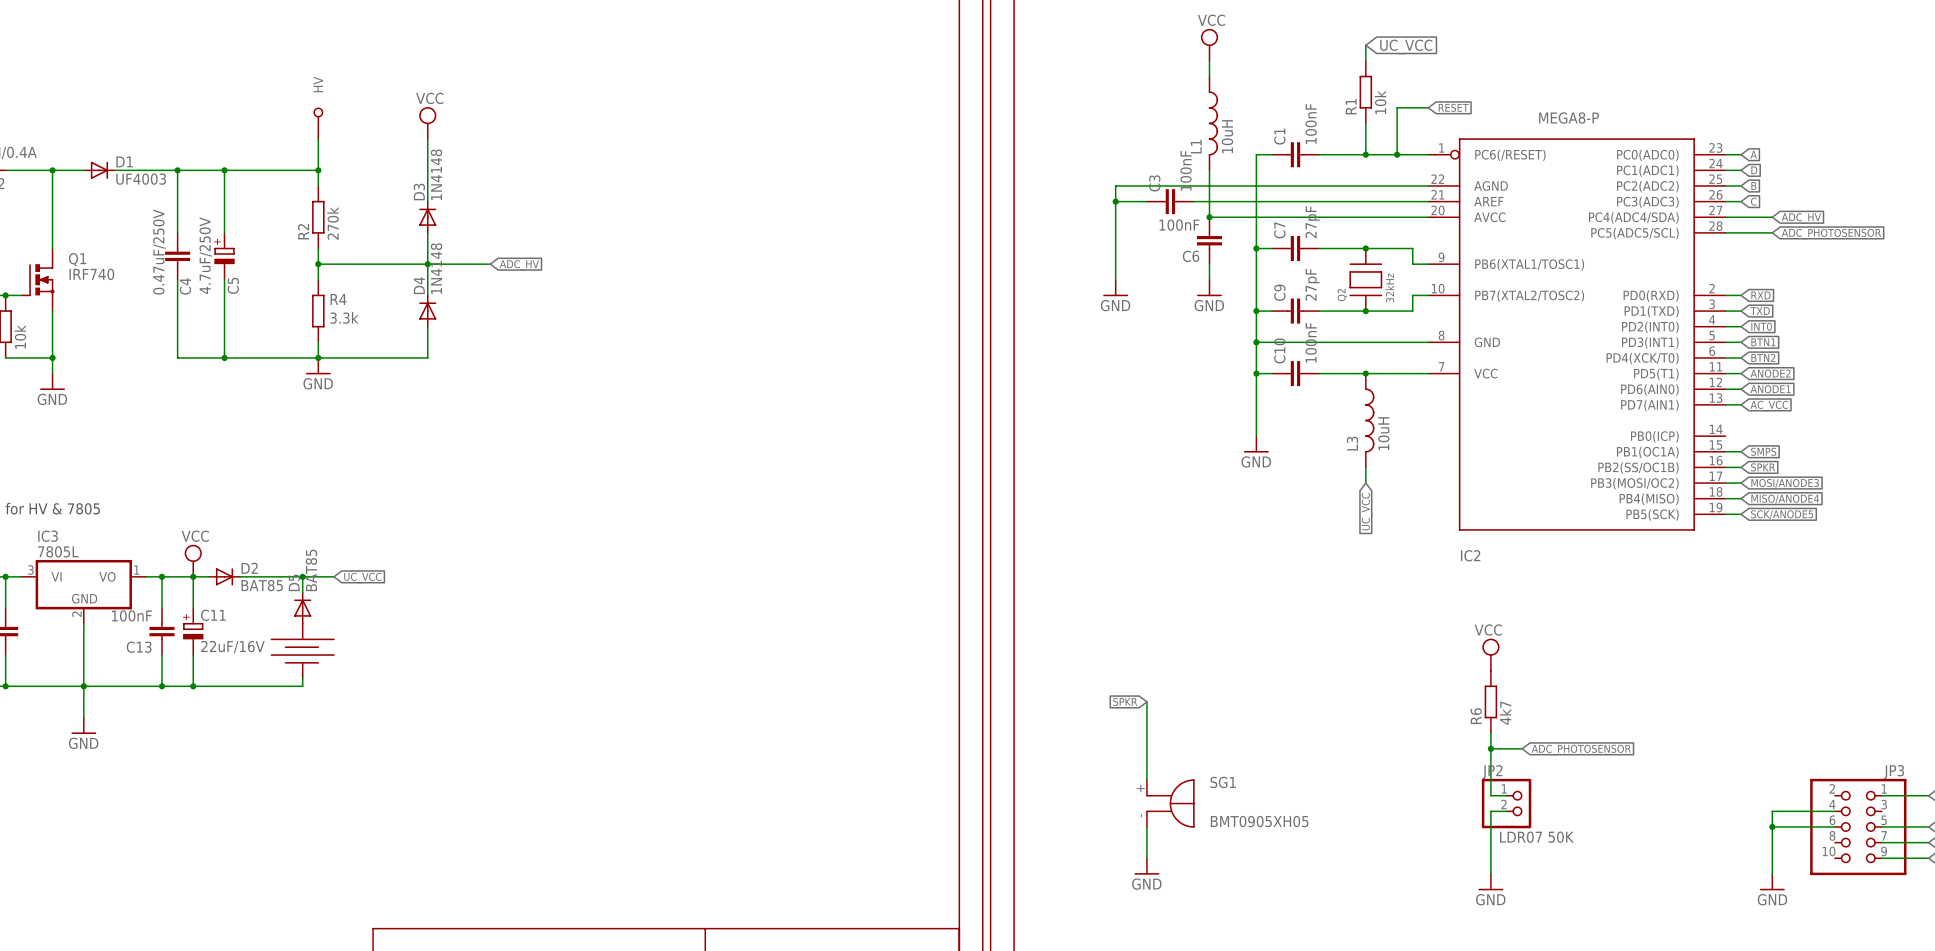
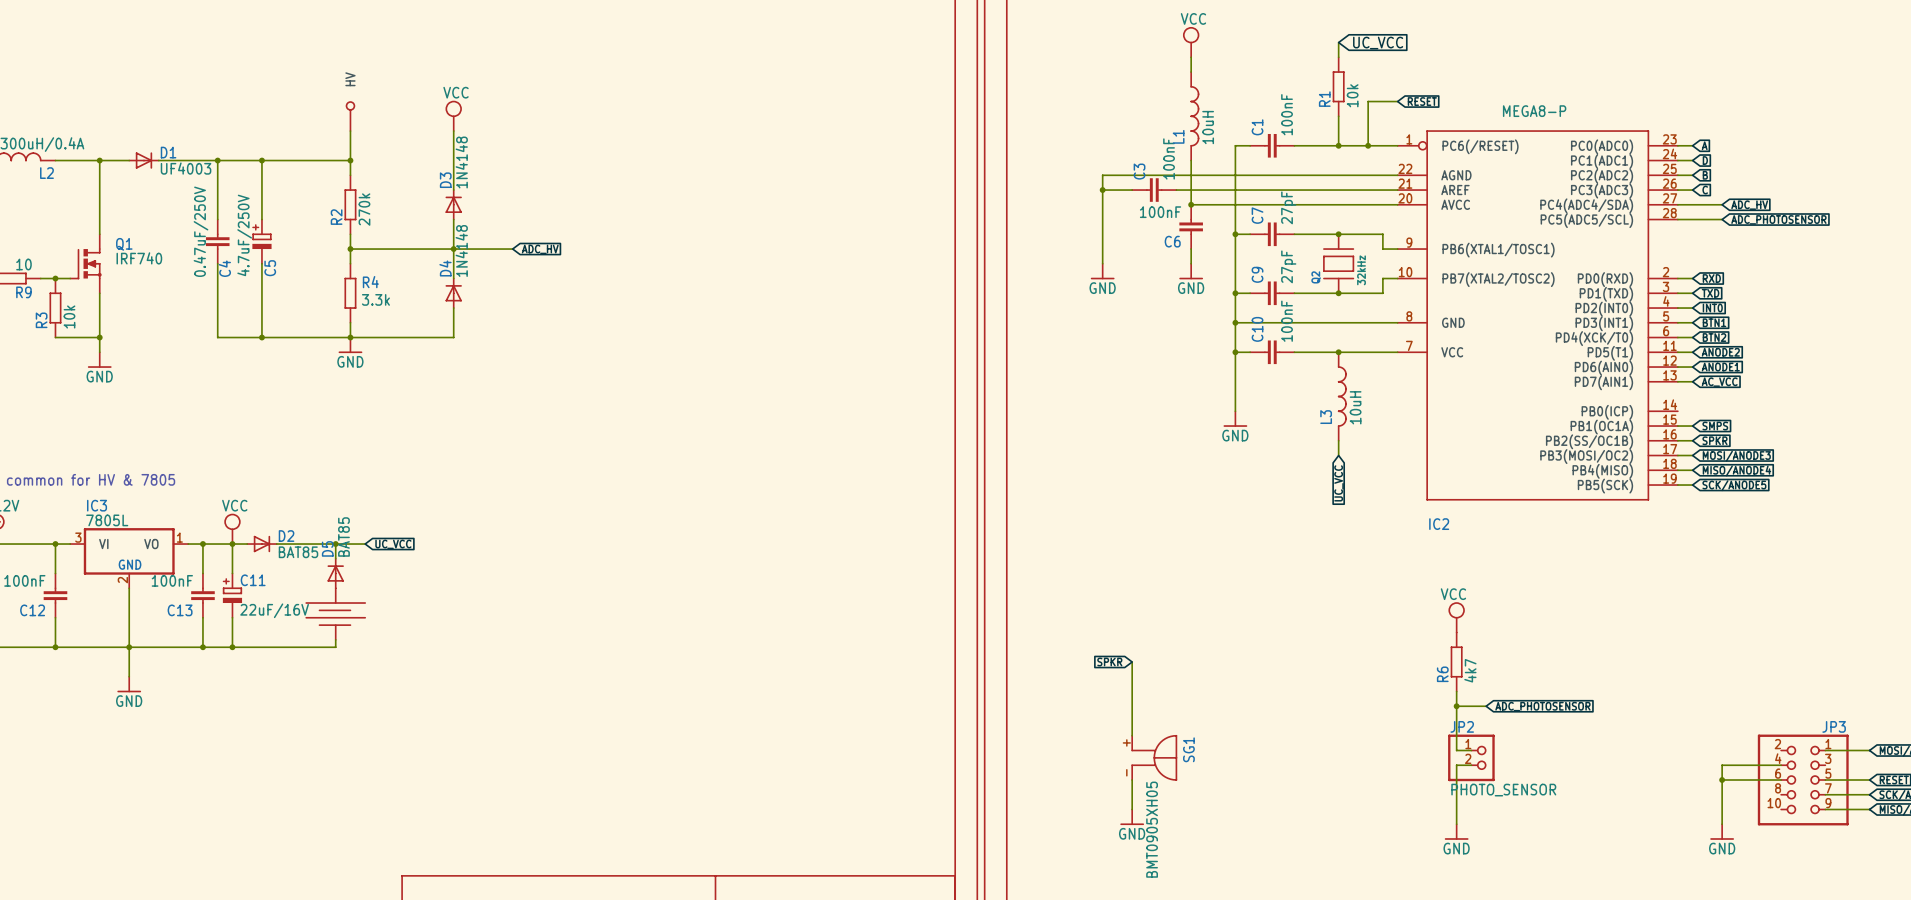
SG1 name rotation: 0° (1223, 782) -> 90° counterclockwise (1188, 749)
SG1 value rotation: 0° (1259, 821) -> 90° counterclockwise (1152, 829)
SG1 value position: BMT0905XH05 (1259, 821) -> BMT0905XH05 (1152, 829)
JP2 value: LDR07 50K (1536, 837) -> PHOTO_SENSOR (1503, 790)

